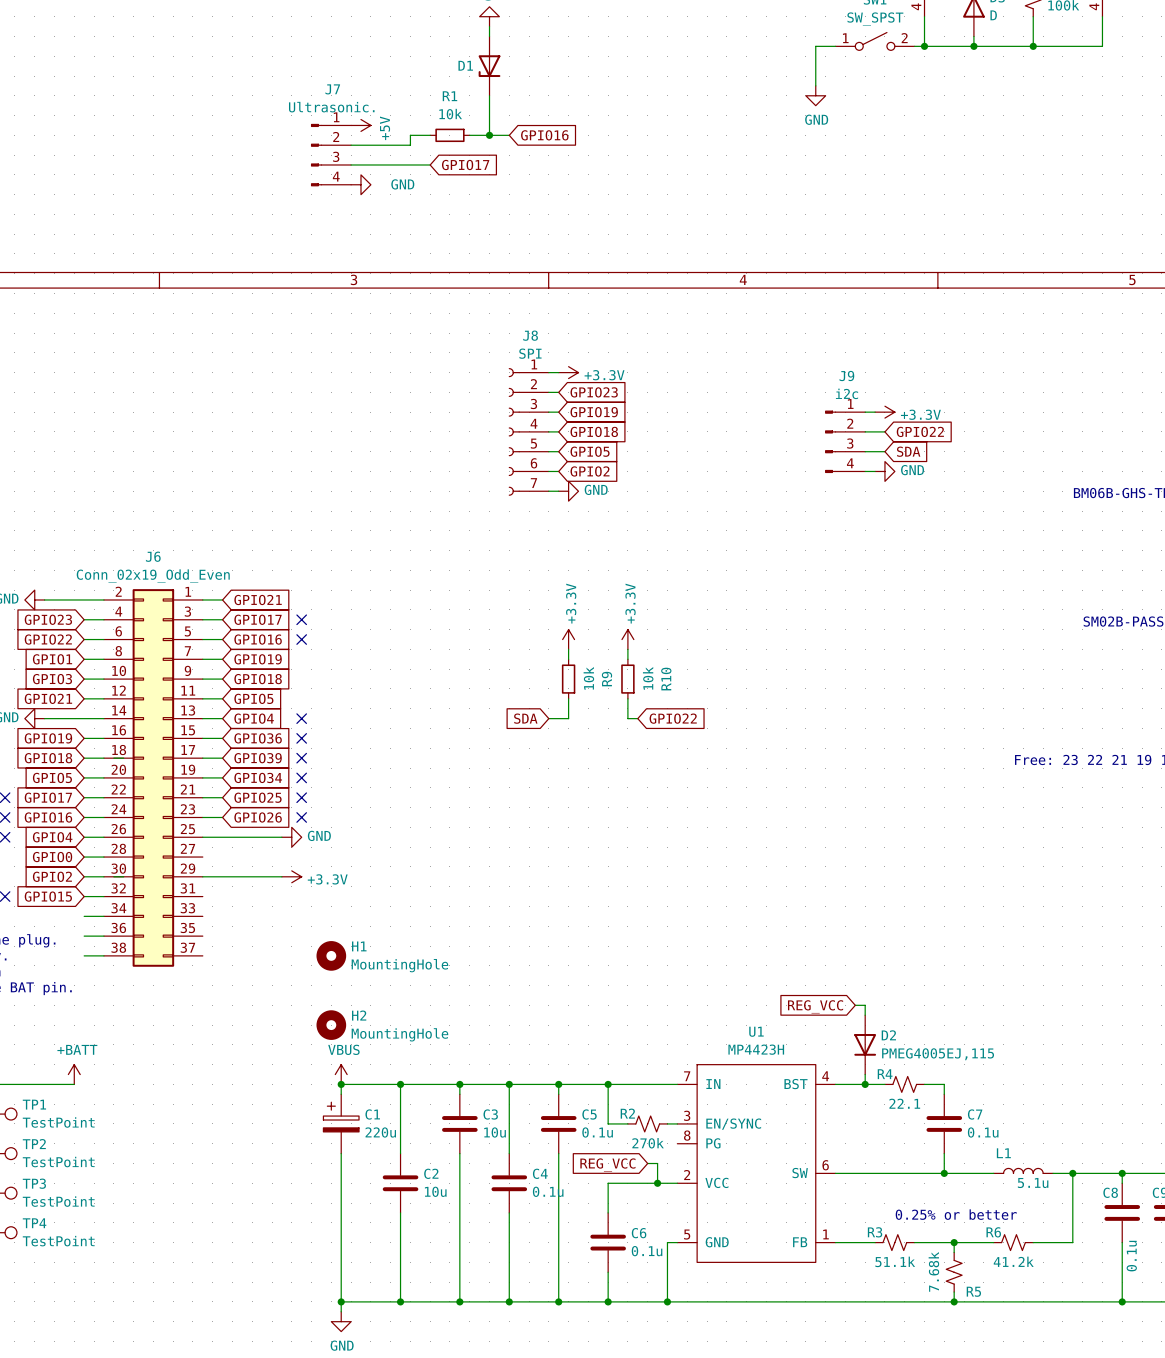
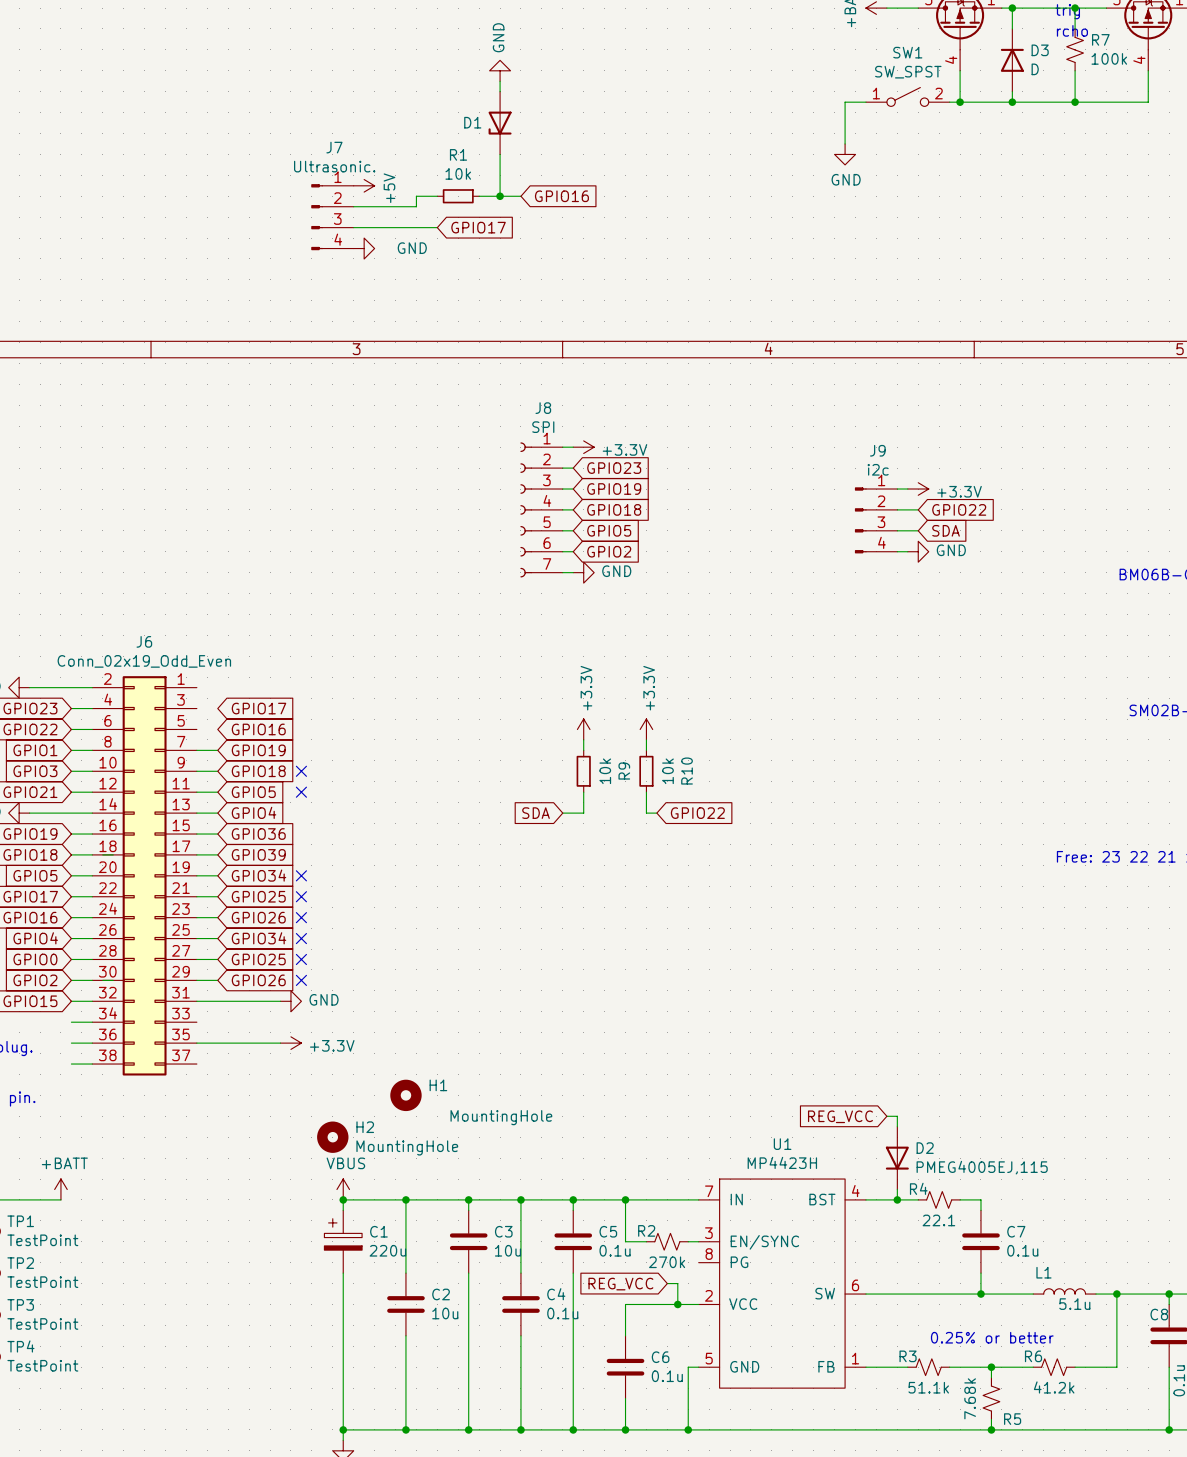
wire: (202, 599) (222, 599) -> none
global label: GPIO21 (258, 600) -> none
wire: (202, 619) (222, 619) -> none
no-connect mark: (301, 619) -> none
wire: (202, 639) (222, 639) -> none
no-connect mark: (301, 639) -> none
no-connect mark: none -> (301, 771)
no-connect mark: none -> (301, 792)
no-connect mark: (301, 718) -> none
no-connect mark: (301, 738) -> none
no-connect mark: (301, 758) -> none
wire: (222, 837) (281, 837) -> none
global label: none -> GPIO34 (258, 938)
power symbol position: GND (291, 837) -> GND (290, 1001)
no-connect mark: none -> (301, 938)
wire: none -> (196, 959) (217, 959)
global label: none -> GPIO25 (258, 959)
no-connect mark: none -> (301, 959)
wire: (222, 876) (281, 876) -> none
global label: none -> GPIO26 (258, 980)
power symbol position: +3.3V (291, 876) -> +3.3V (290, 1043)
no-connect mark: none -> (301, 980)
wire: none -> (196, 1001) (280, 1001)
wire: none -> (196, 1043) (280, 1043)
H1 position: (331, 955) -> (405, 1095)
H1 value position: MountingHole (399, 965) -> MountingHole (501, 1117)

